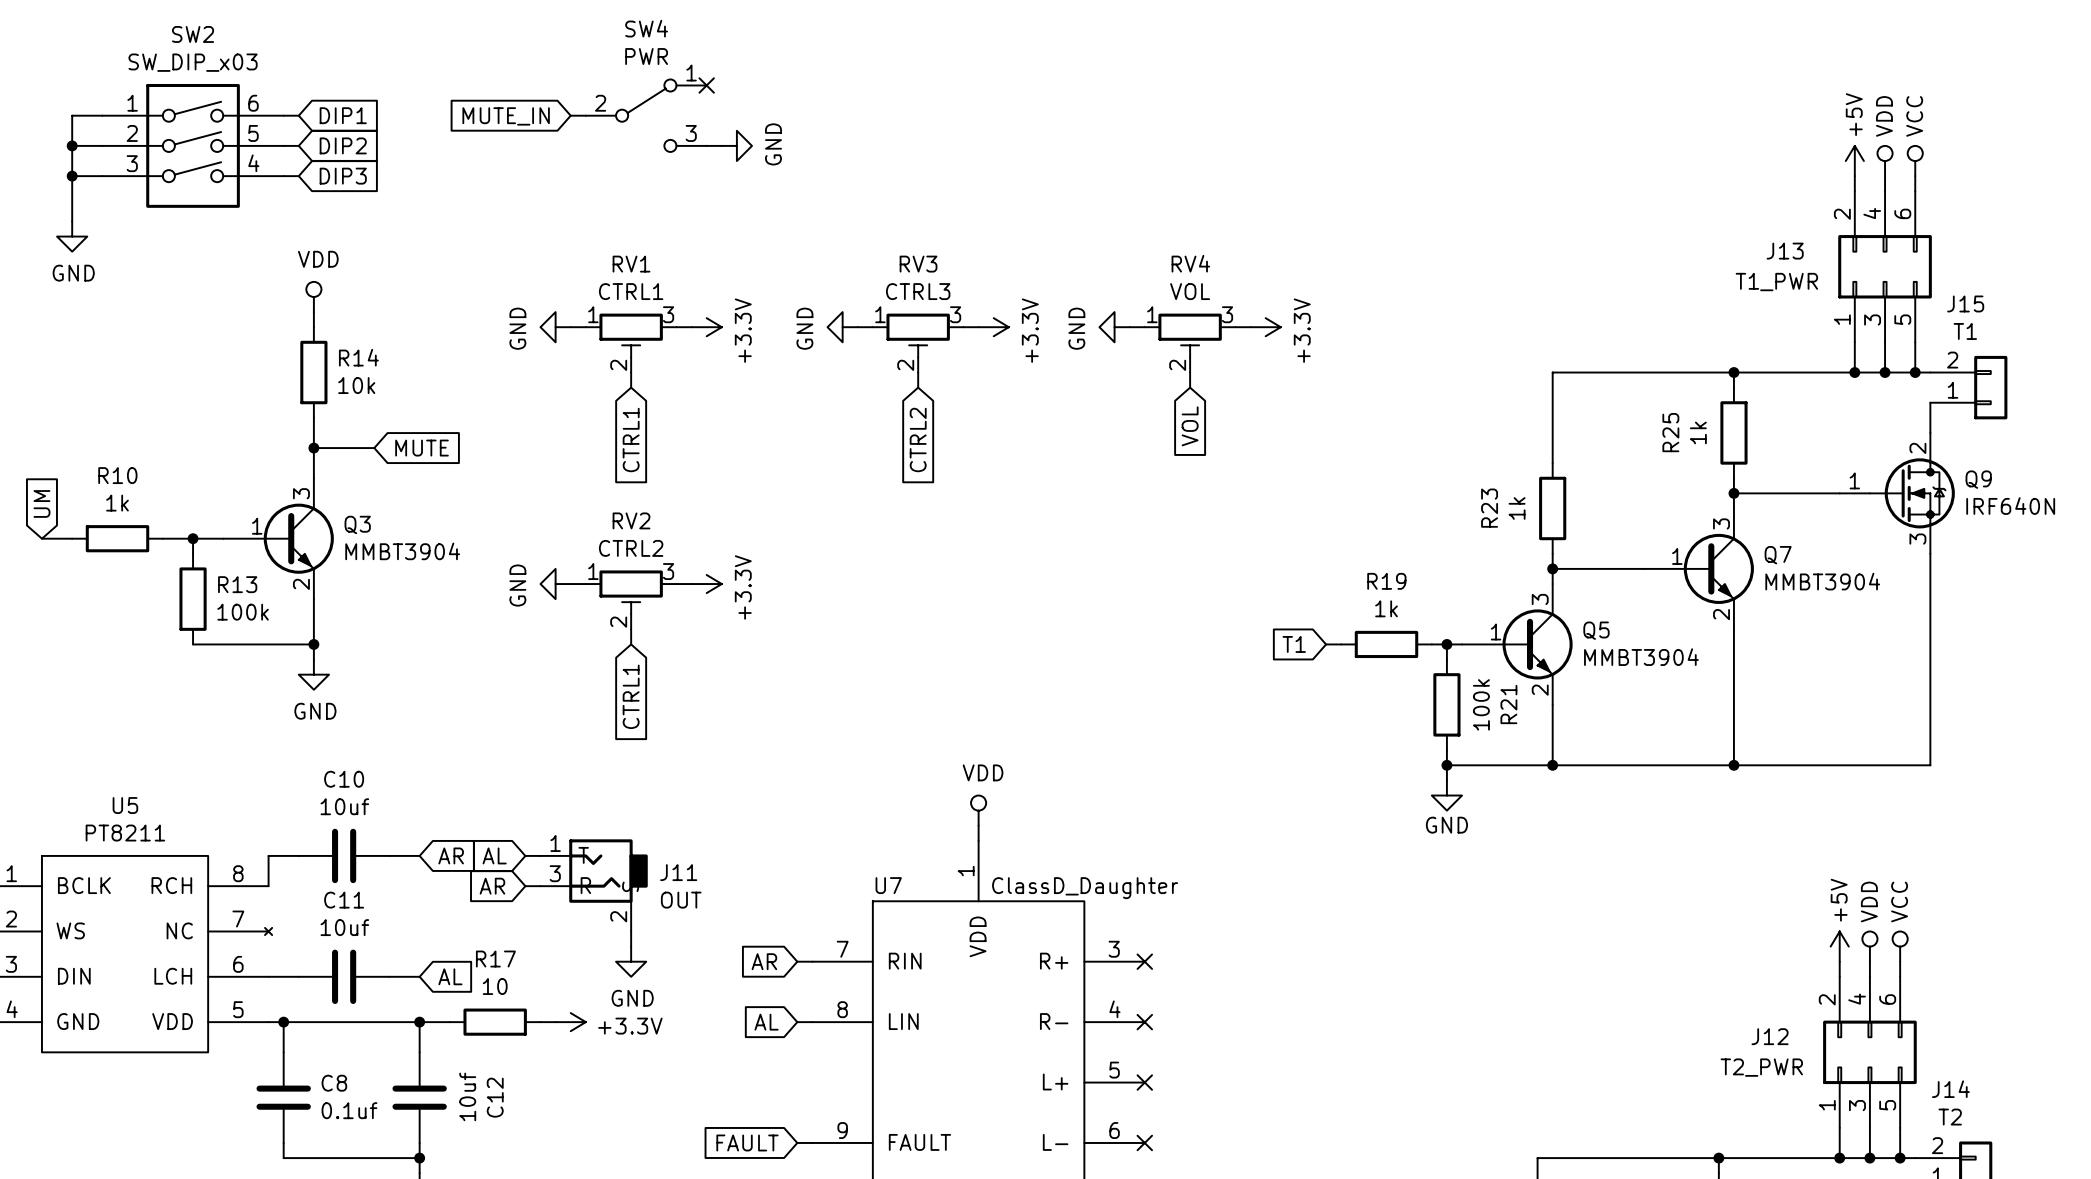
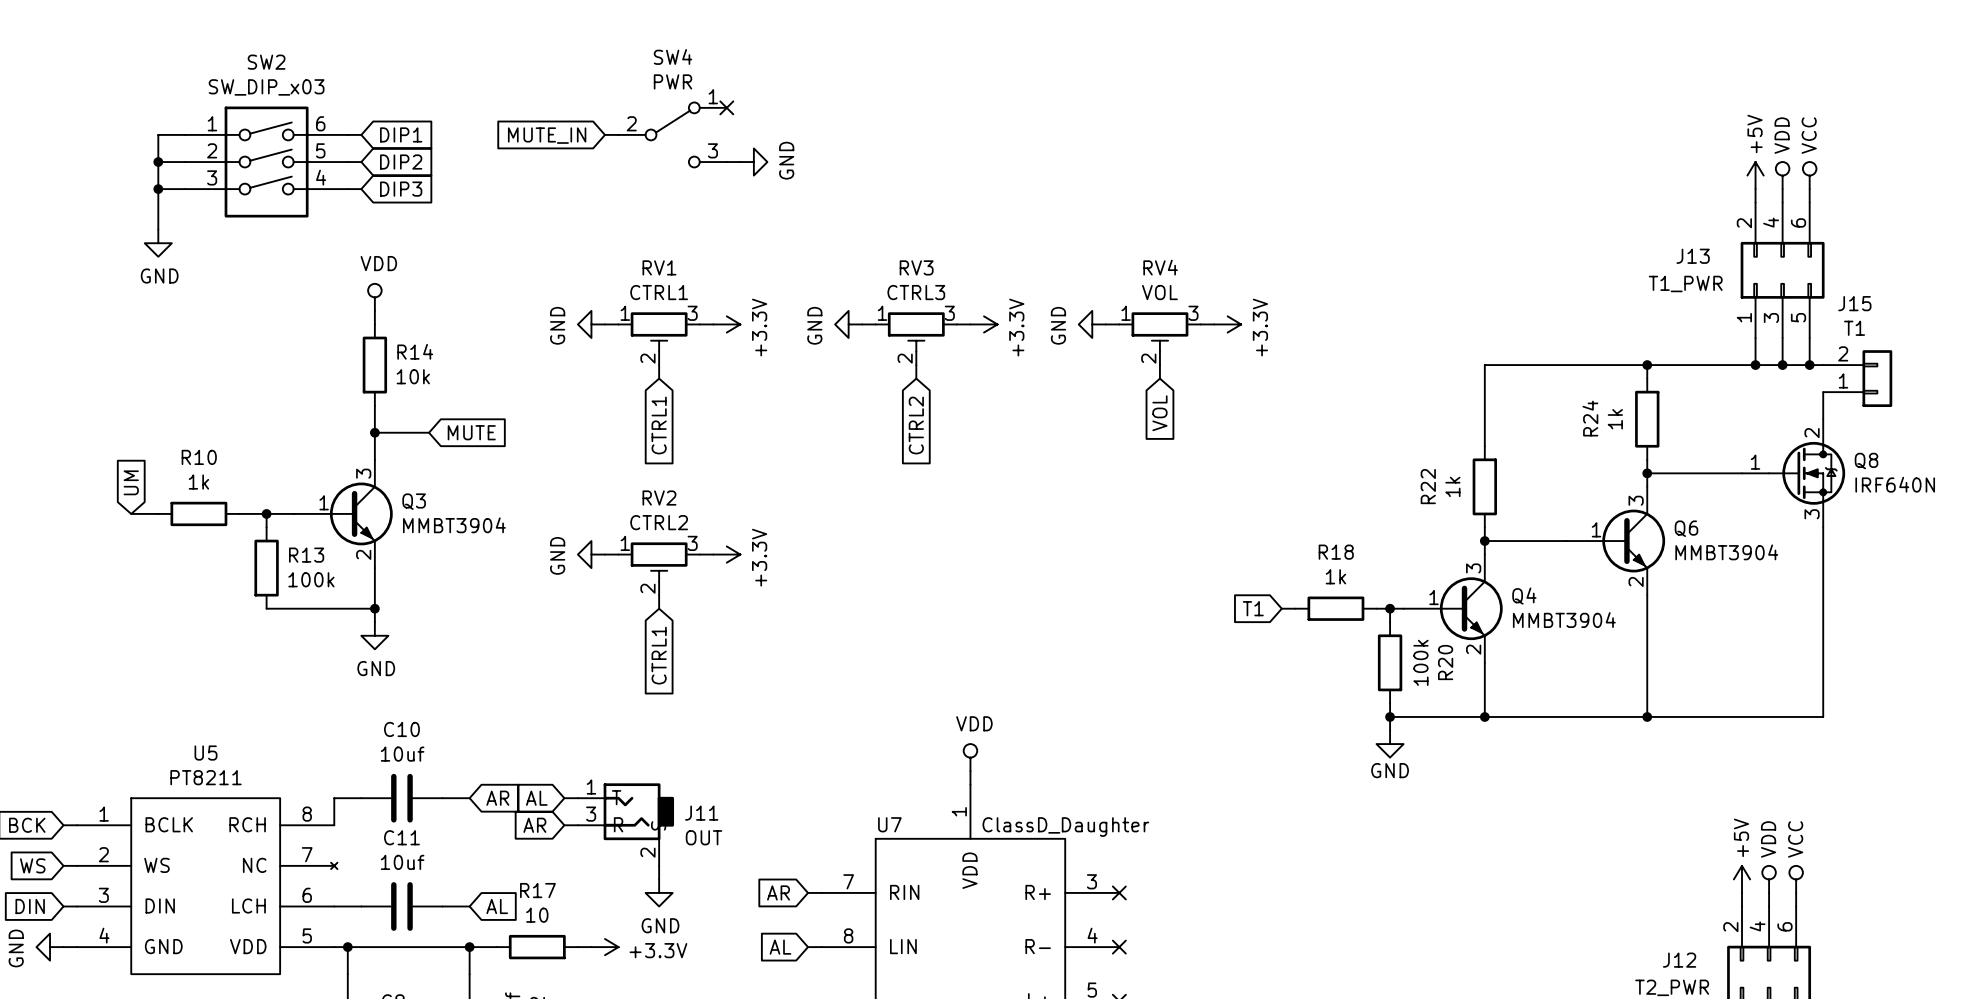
R25 name: R25 (1670, 432) -> R24 (1590, 418)
Q9 name: Q9 (1978, 479) -> Q8 (1866, 461)
R23 name: R23 (1489, 508) -> R22 (1428, 486)
Q7 name: Q7 (1778, 555) -> Q6 (1686, 528)
R19 name: R19 (1386, 581) -> R18 (1336, 552)
Q5 name: Q5 (1596, 630) -> Q4 (1524, 596)
R21 name: R21 (1508, 704) -> R20 (1445, 662)

